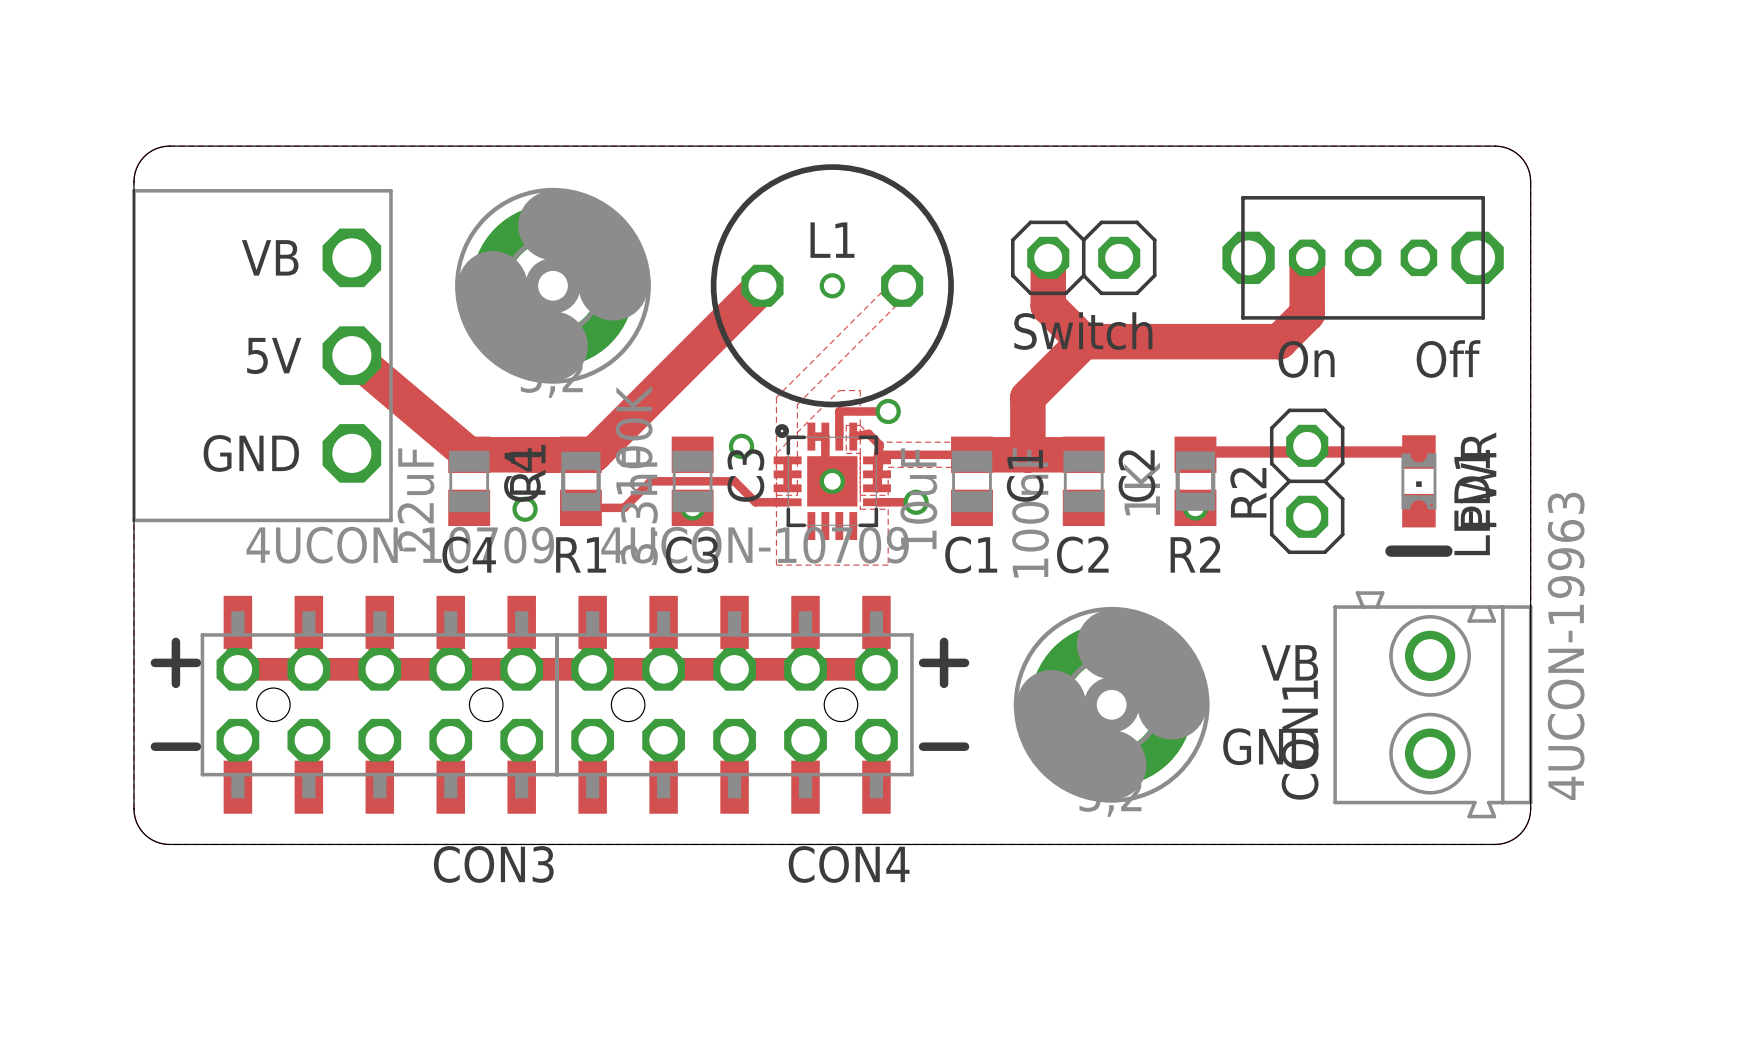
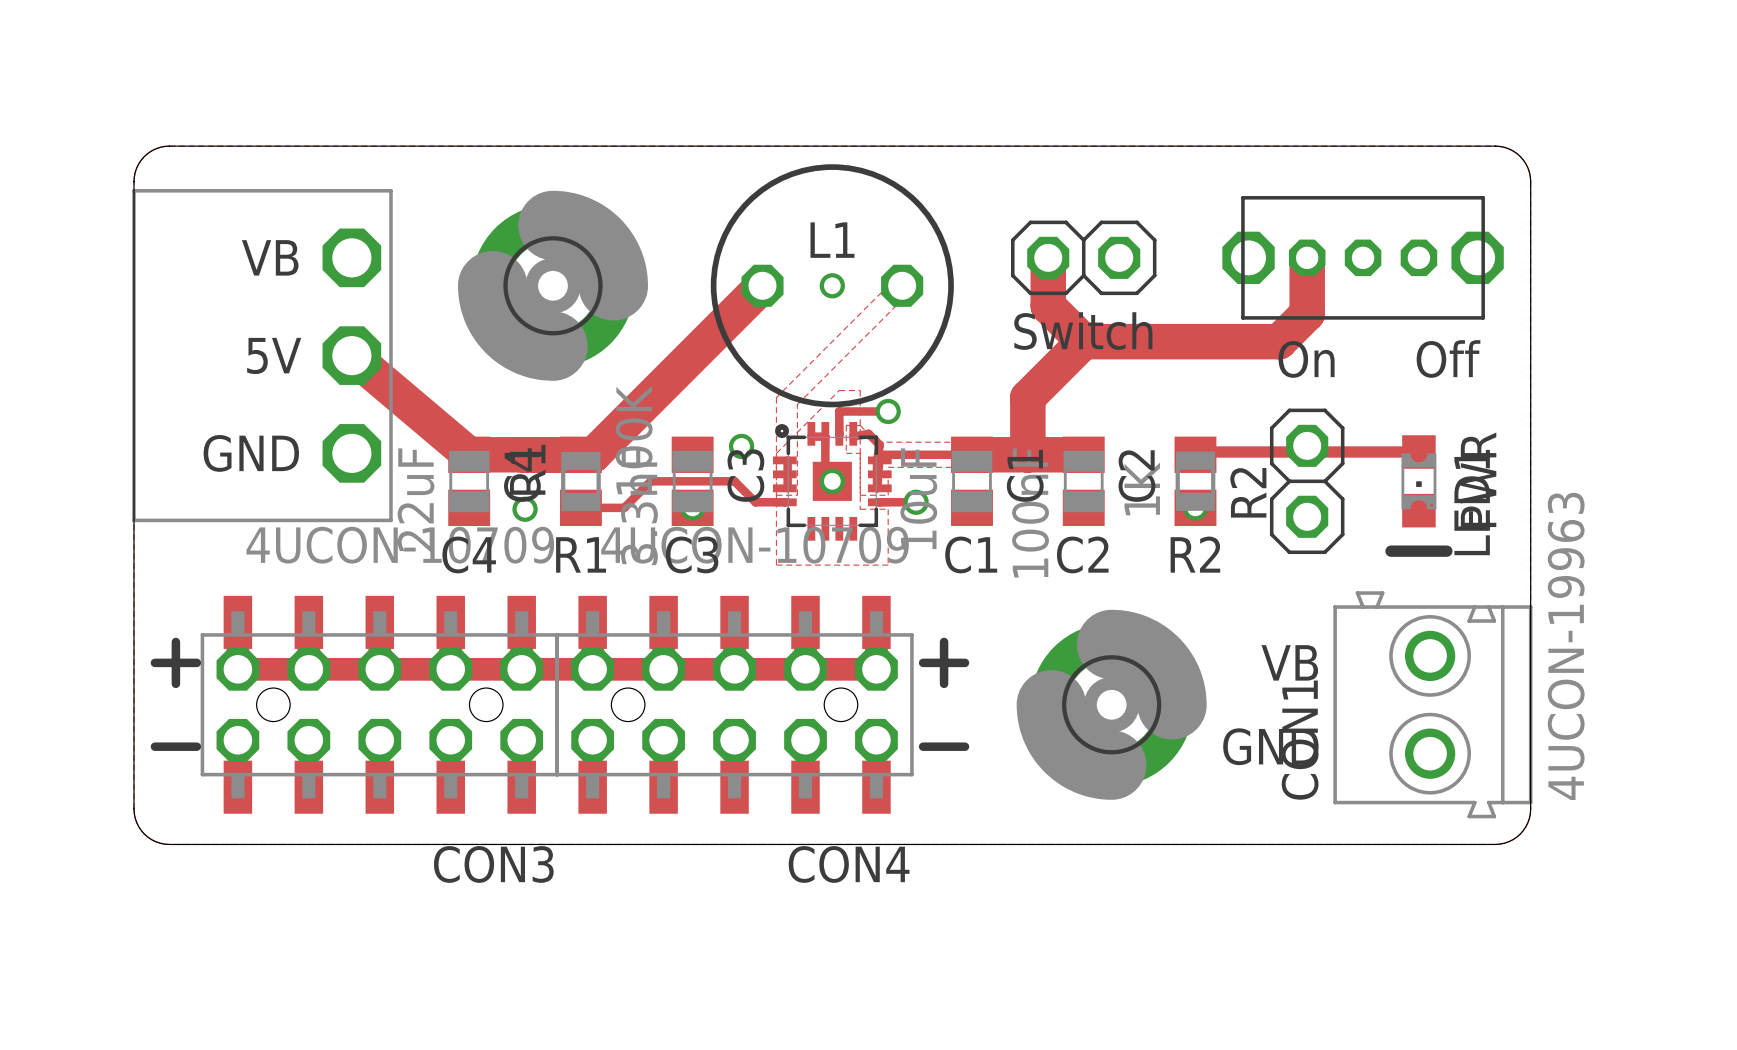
part footprint: [455, 187, 651, 384] -> [457, 190, 649, 381]
part footprint: [773, 422, 891, 540] -> [772, 421, 892, 541]
part footprint: [1013, 606, 1210, 803] -> [1016, 609, 1207, 800]

